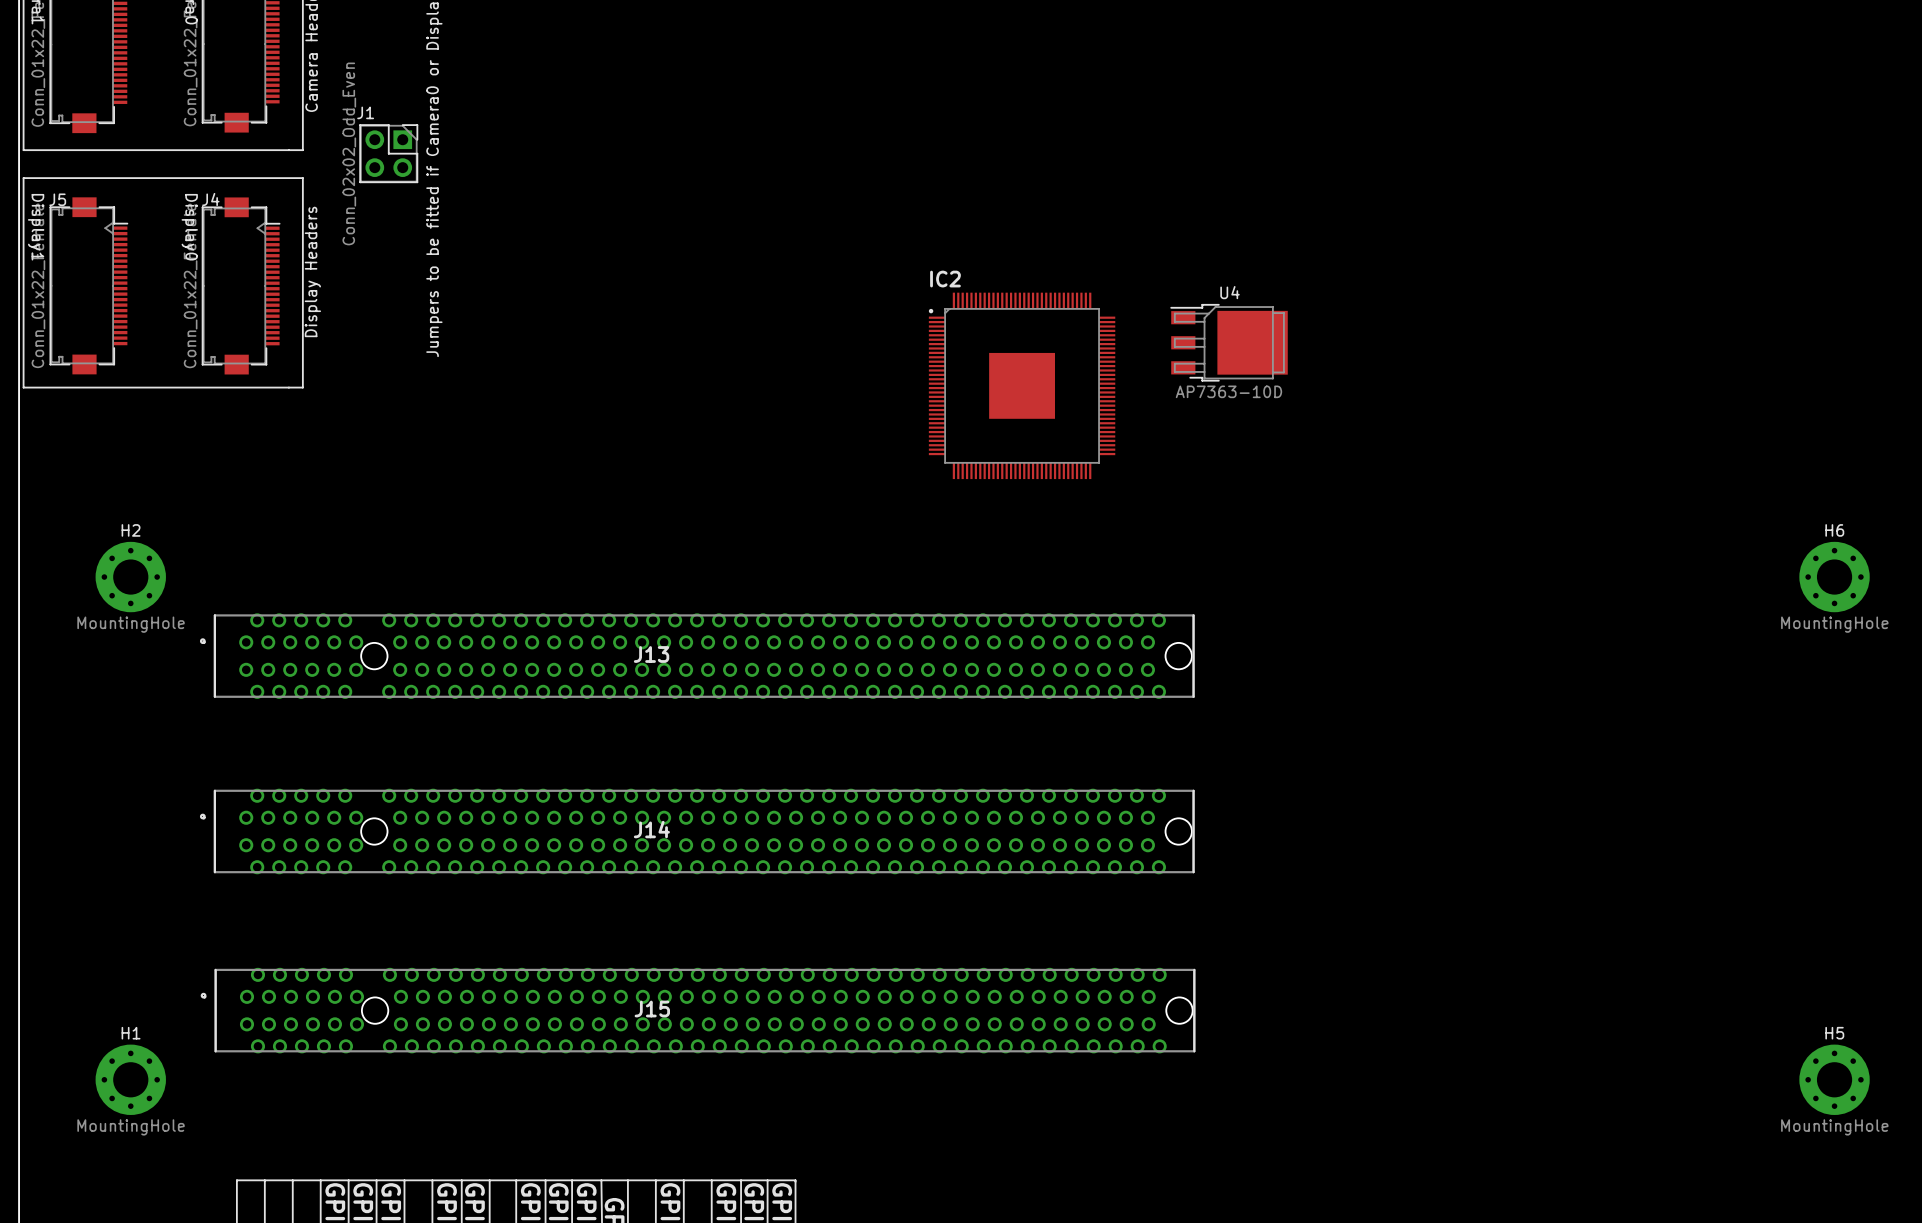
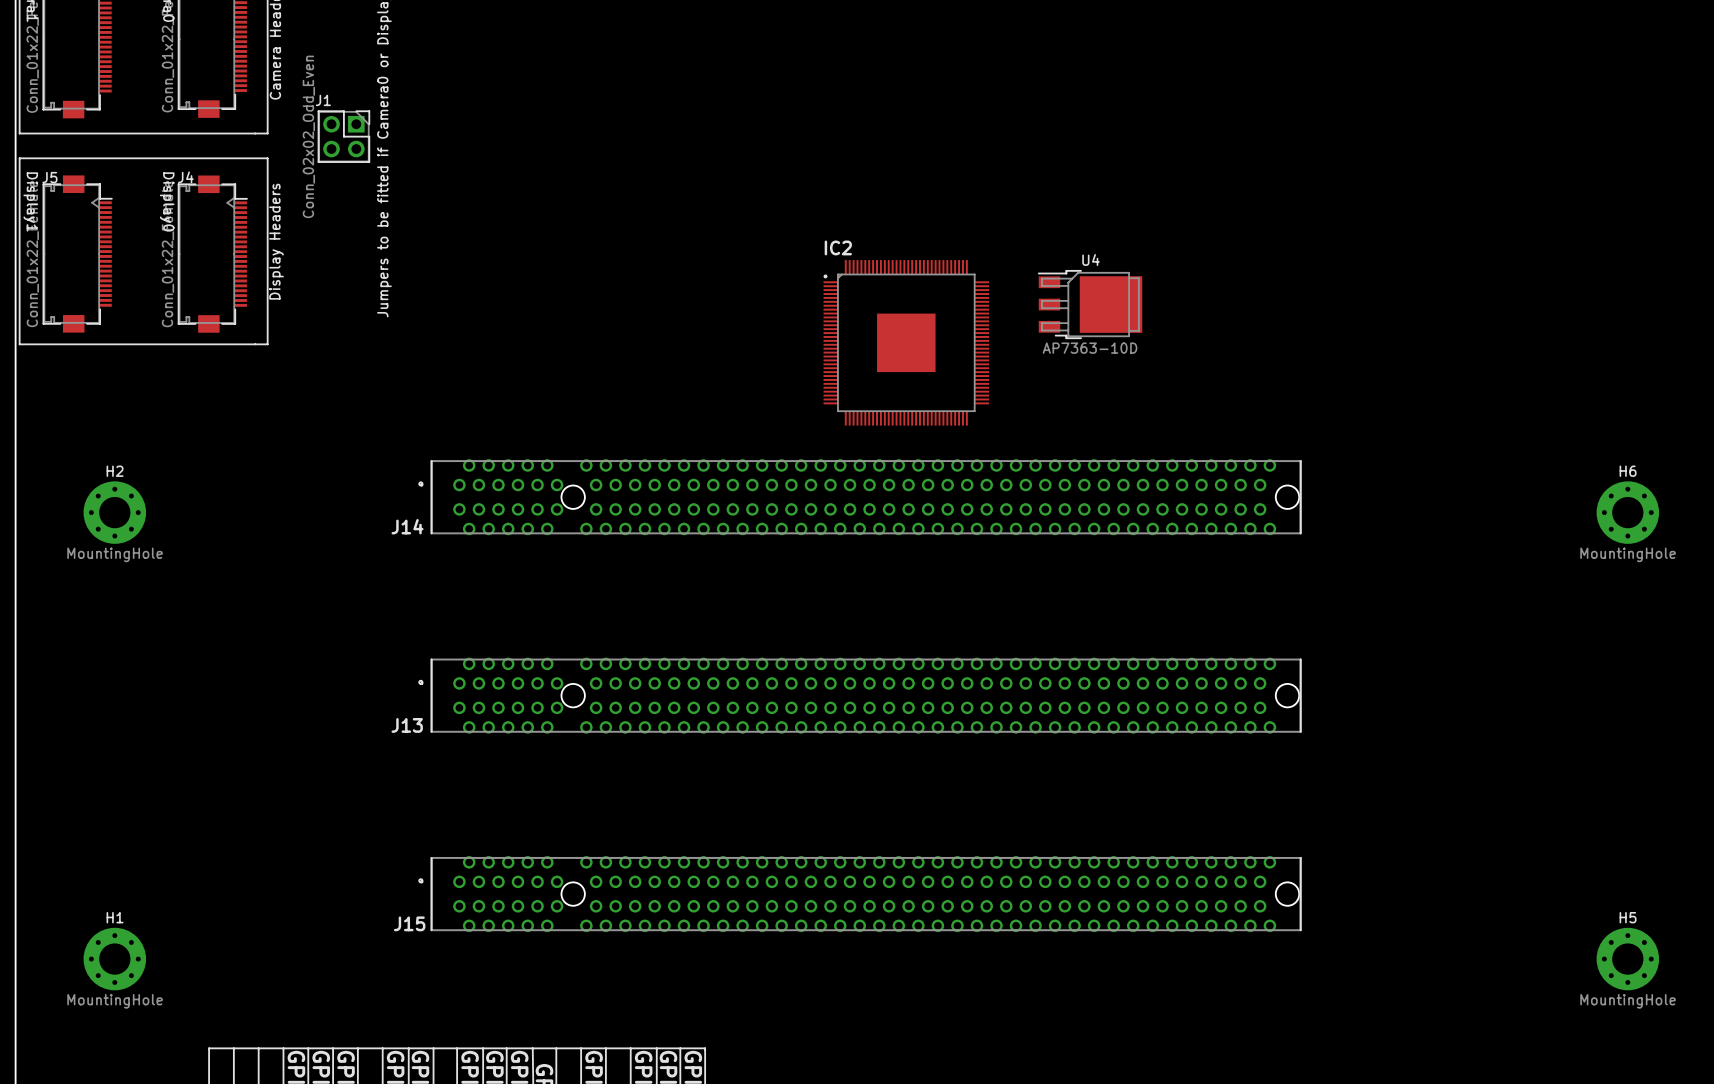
J13 name position: J13 (651, 654) -> J13 (407, 725)
J13 position: (697, 656) -> (859, 695)
J14 name position: J14 (651, 829) -> J14 (407, 526)
J14 position: (697, 831) -> (859, 497)
J15 name position: J15 (652, 1009) -> J15 (409, 923)
J15 position: (698, 1010) -> (859, 894)

